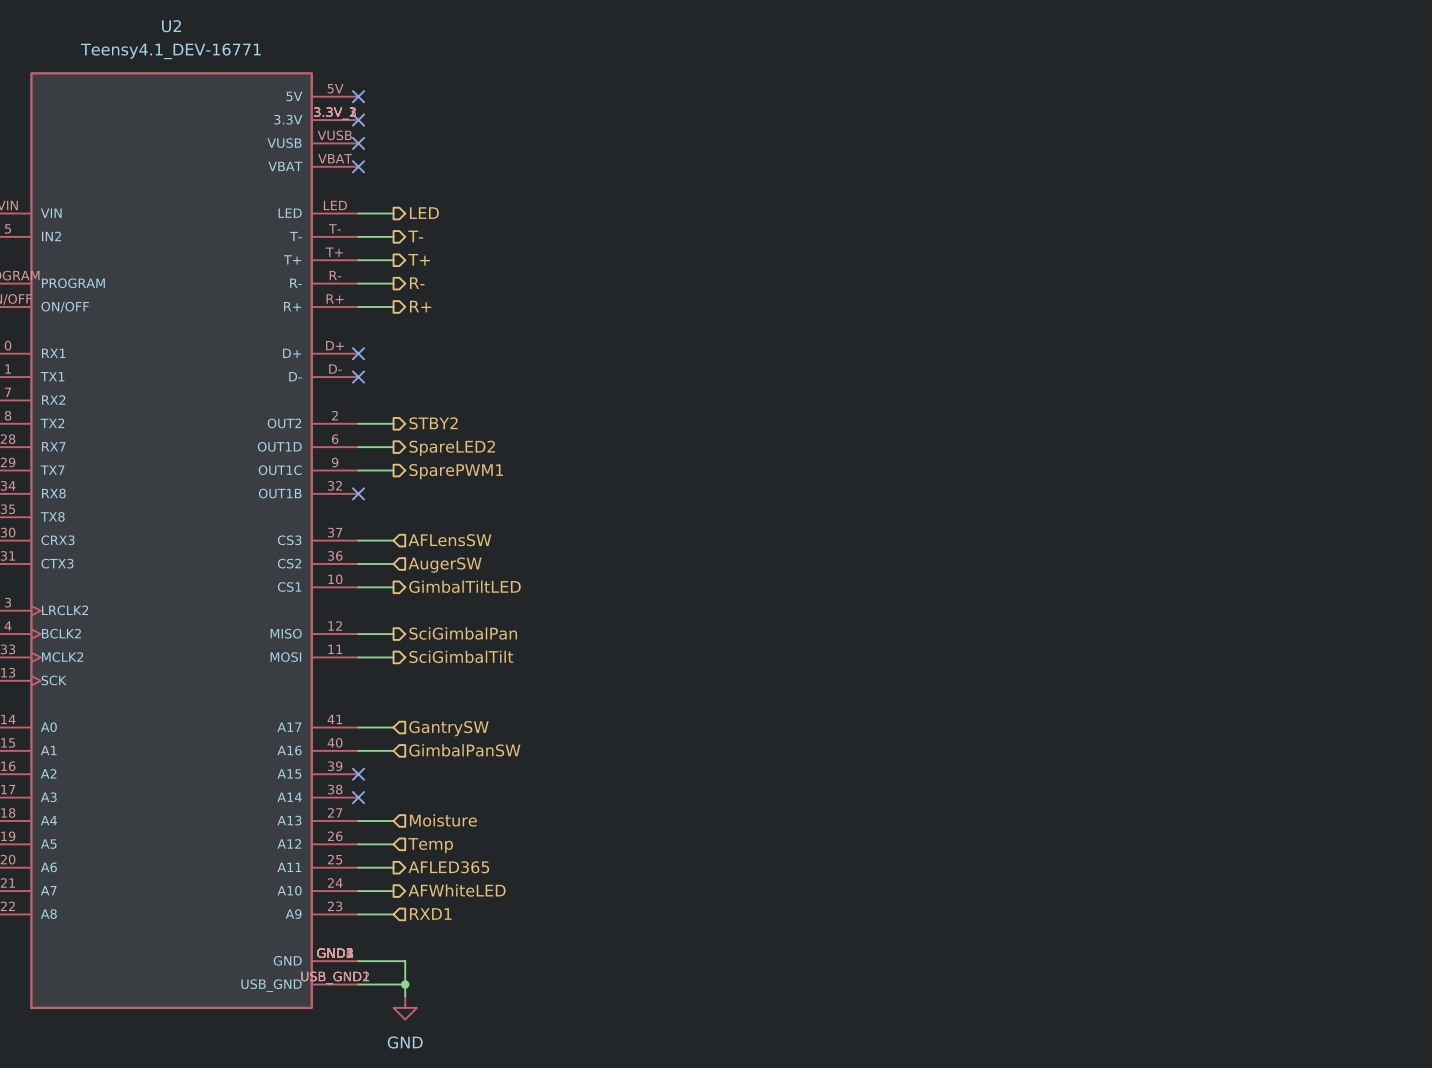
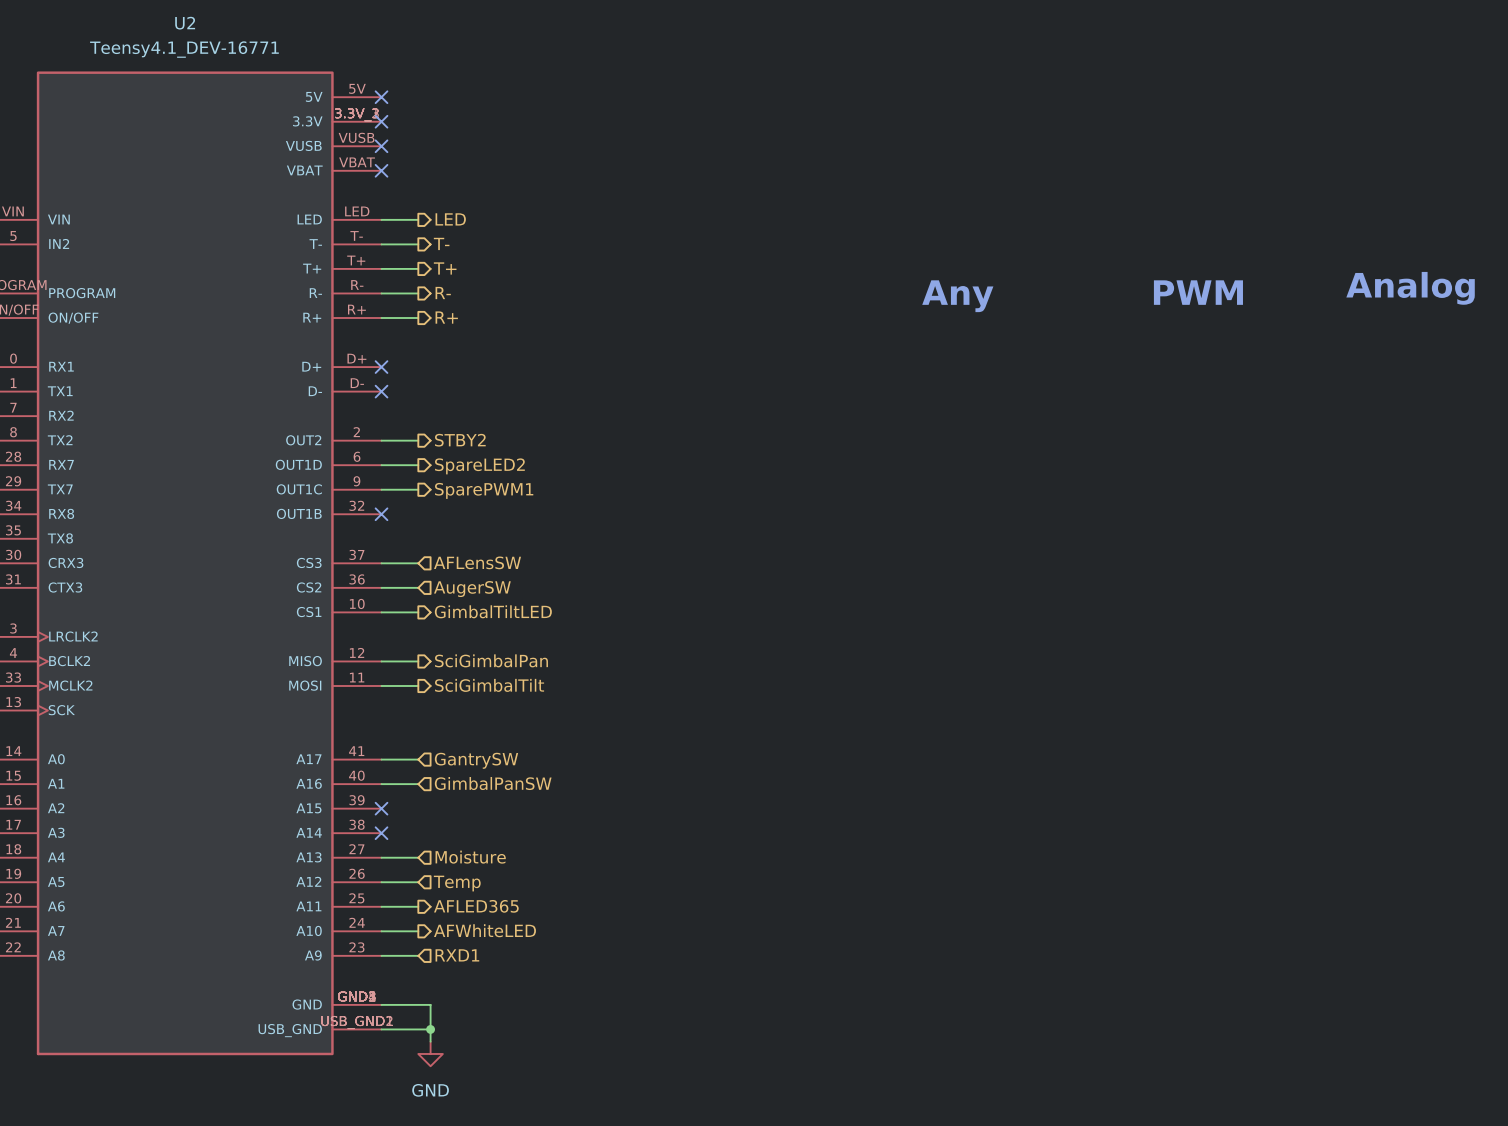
text: none -> Analog (1410, 288)
text: none -> PWM (1198, 292)
text: none -> Any (957, 296)

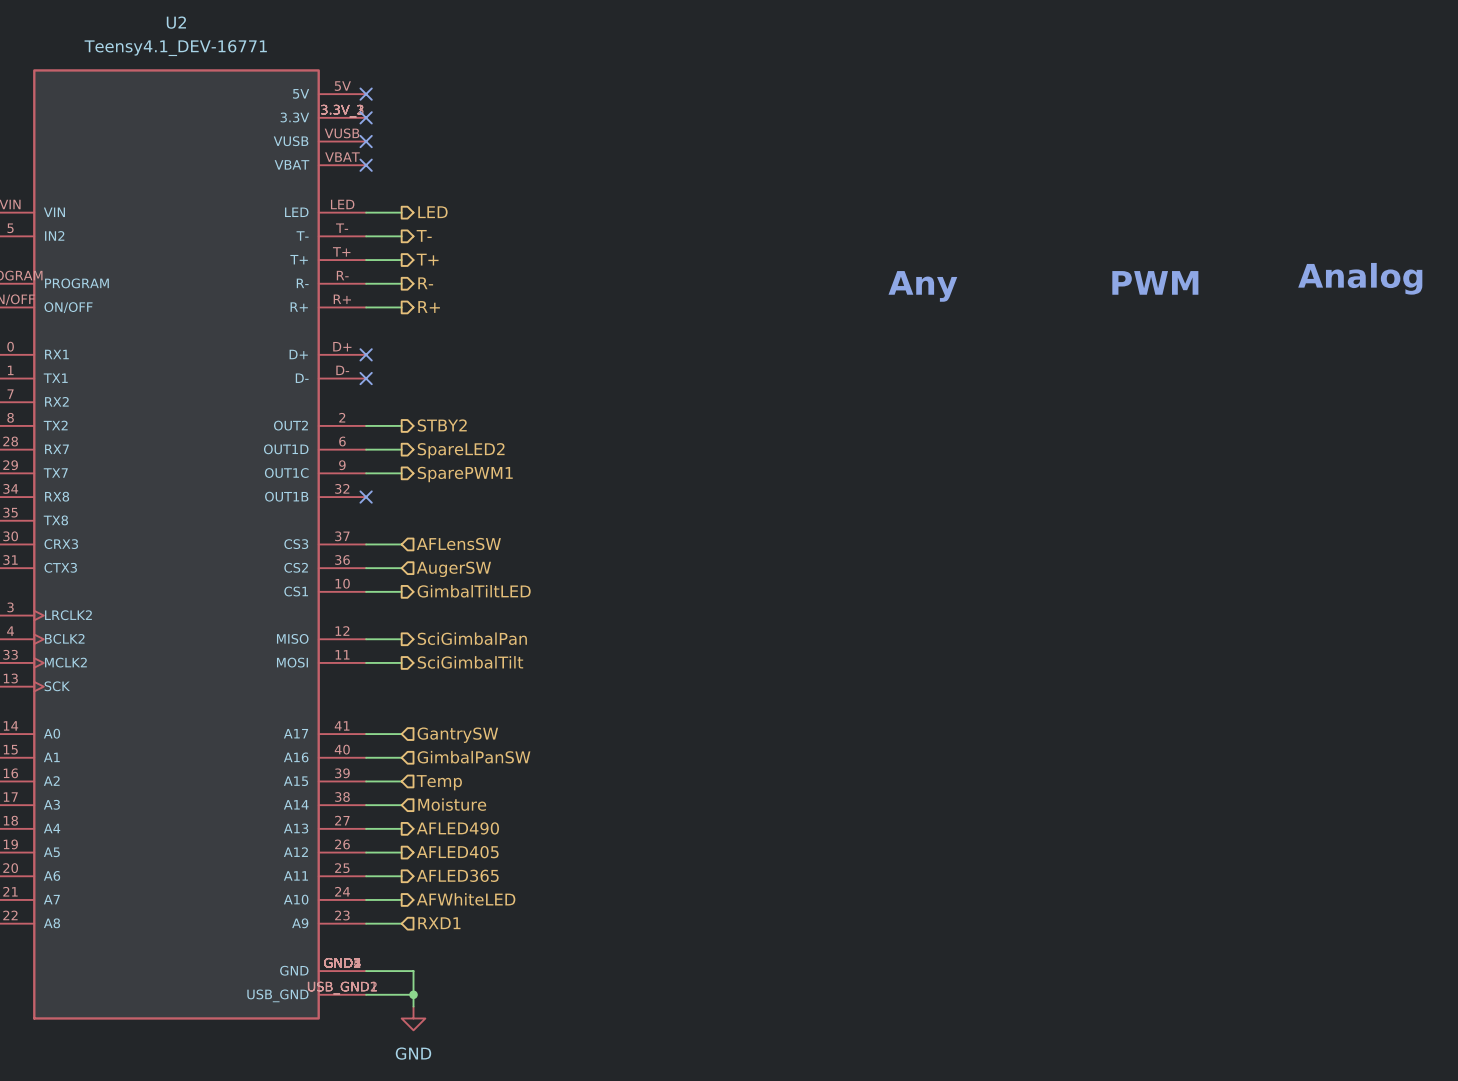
wire: none -> (366, 781) (401, 781)
no-connect mark: (381, 808) -> none
hierarchical label: none -> Temp (439, 782)
hierarchical label: none -> Moisture (452, 804)
wire: none -> (366, 805) (401, 805)
no-connect mark: (381, 833) -> none
hierarchical label shape: input (470, 857) -> output (457, 828)
hierarchical label: Moisture (470, 857) -> AFLED490 (457, 828)
hierarchical label shape: input (457, 883) -> output (457, 852)
hierarchical label: Temp (457, 883) -> AFLED405 (457, 852)

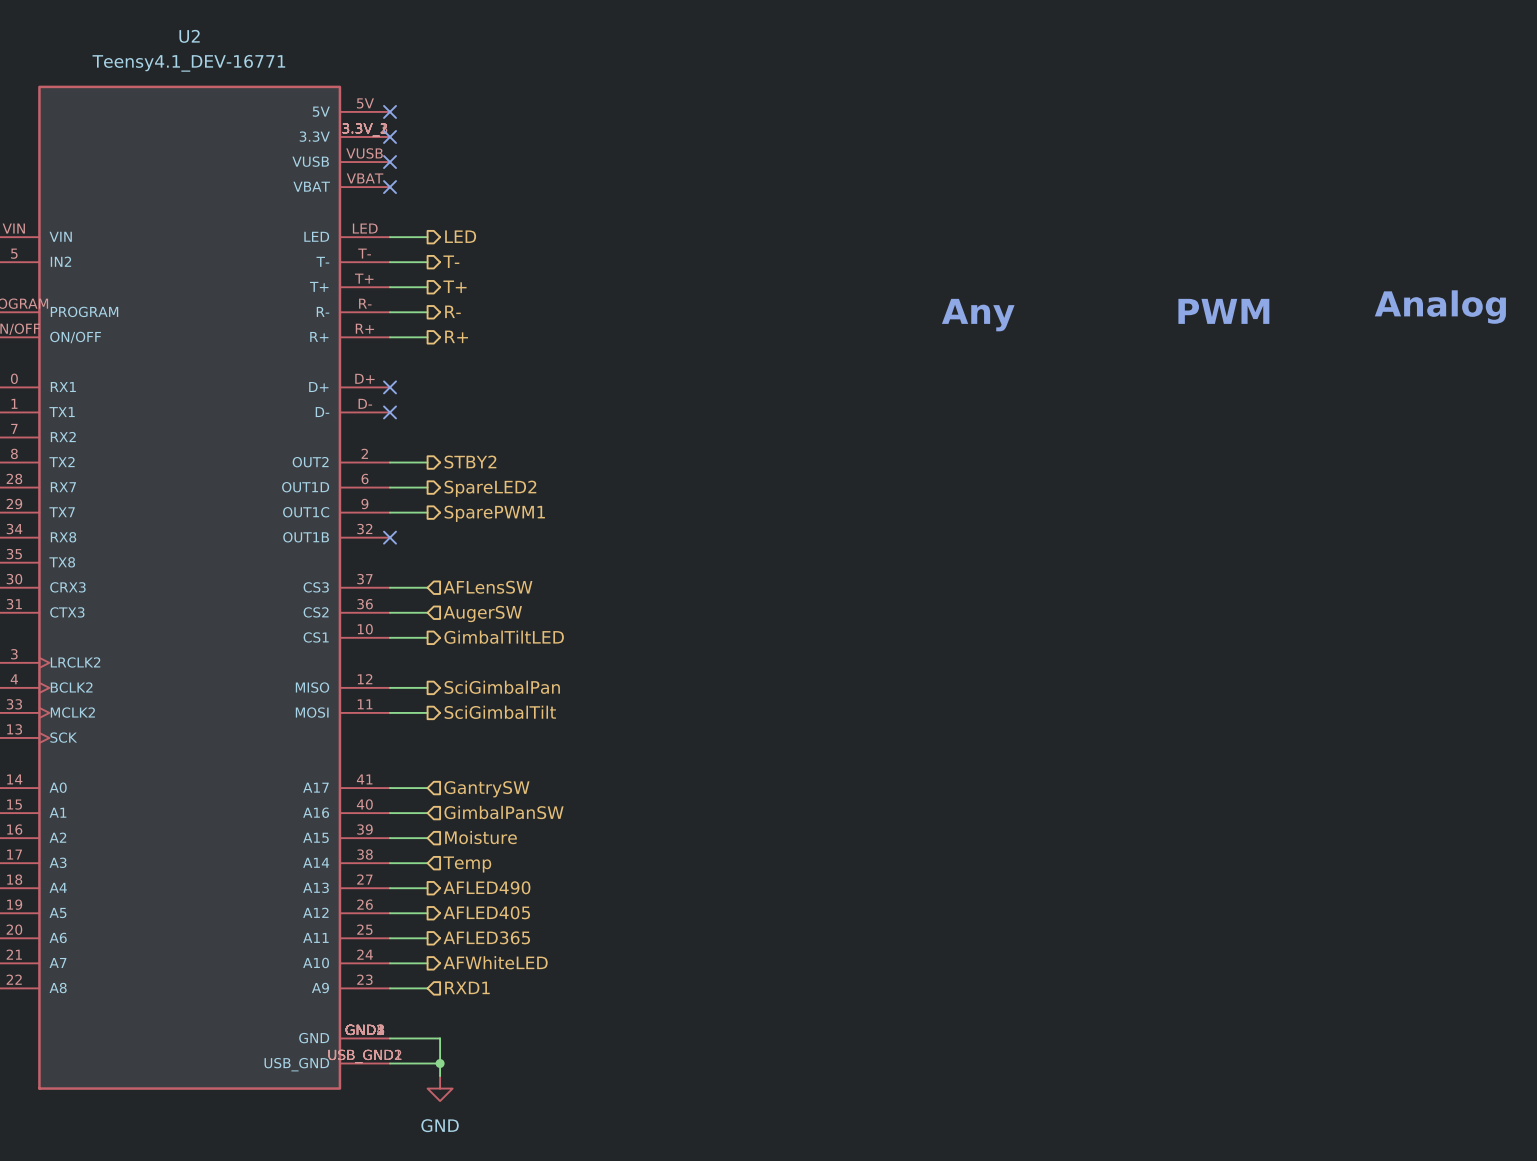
hierarchical label: Temp (439, 782) -> Moisture (481, 837)
hierarchical label: Moisture (452, 804) -> Temp (467, 864)

